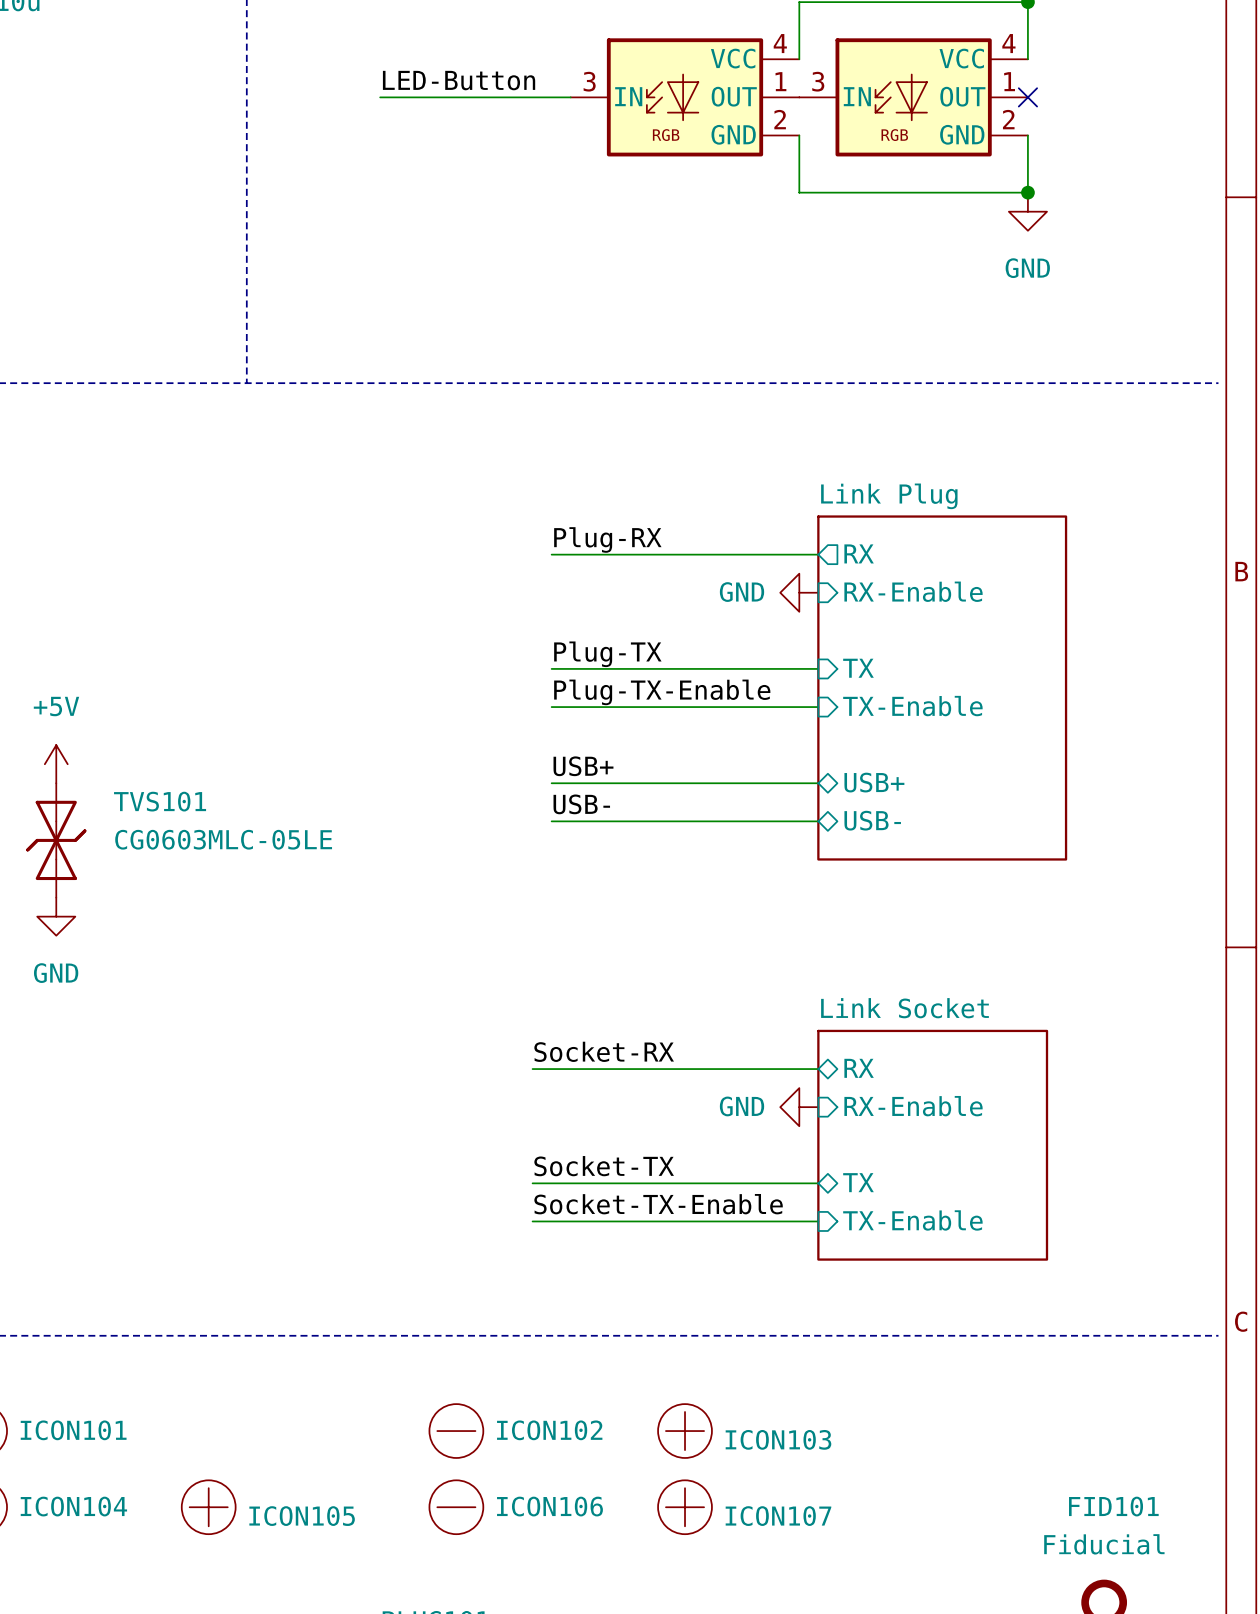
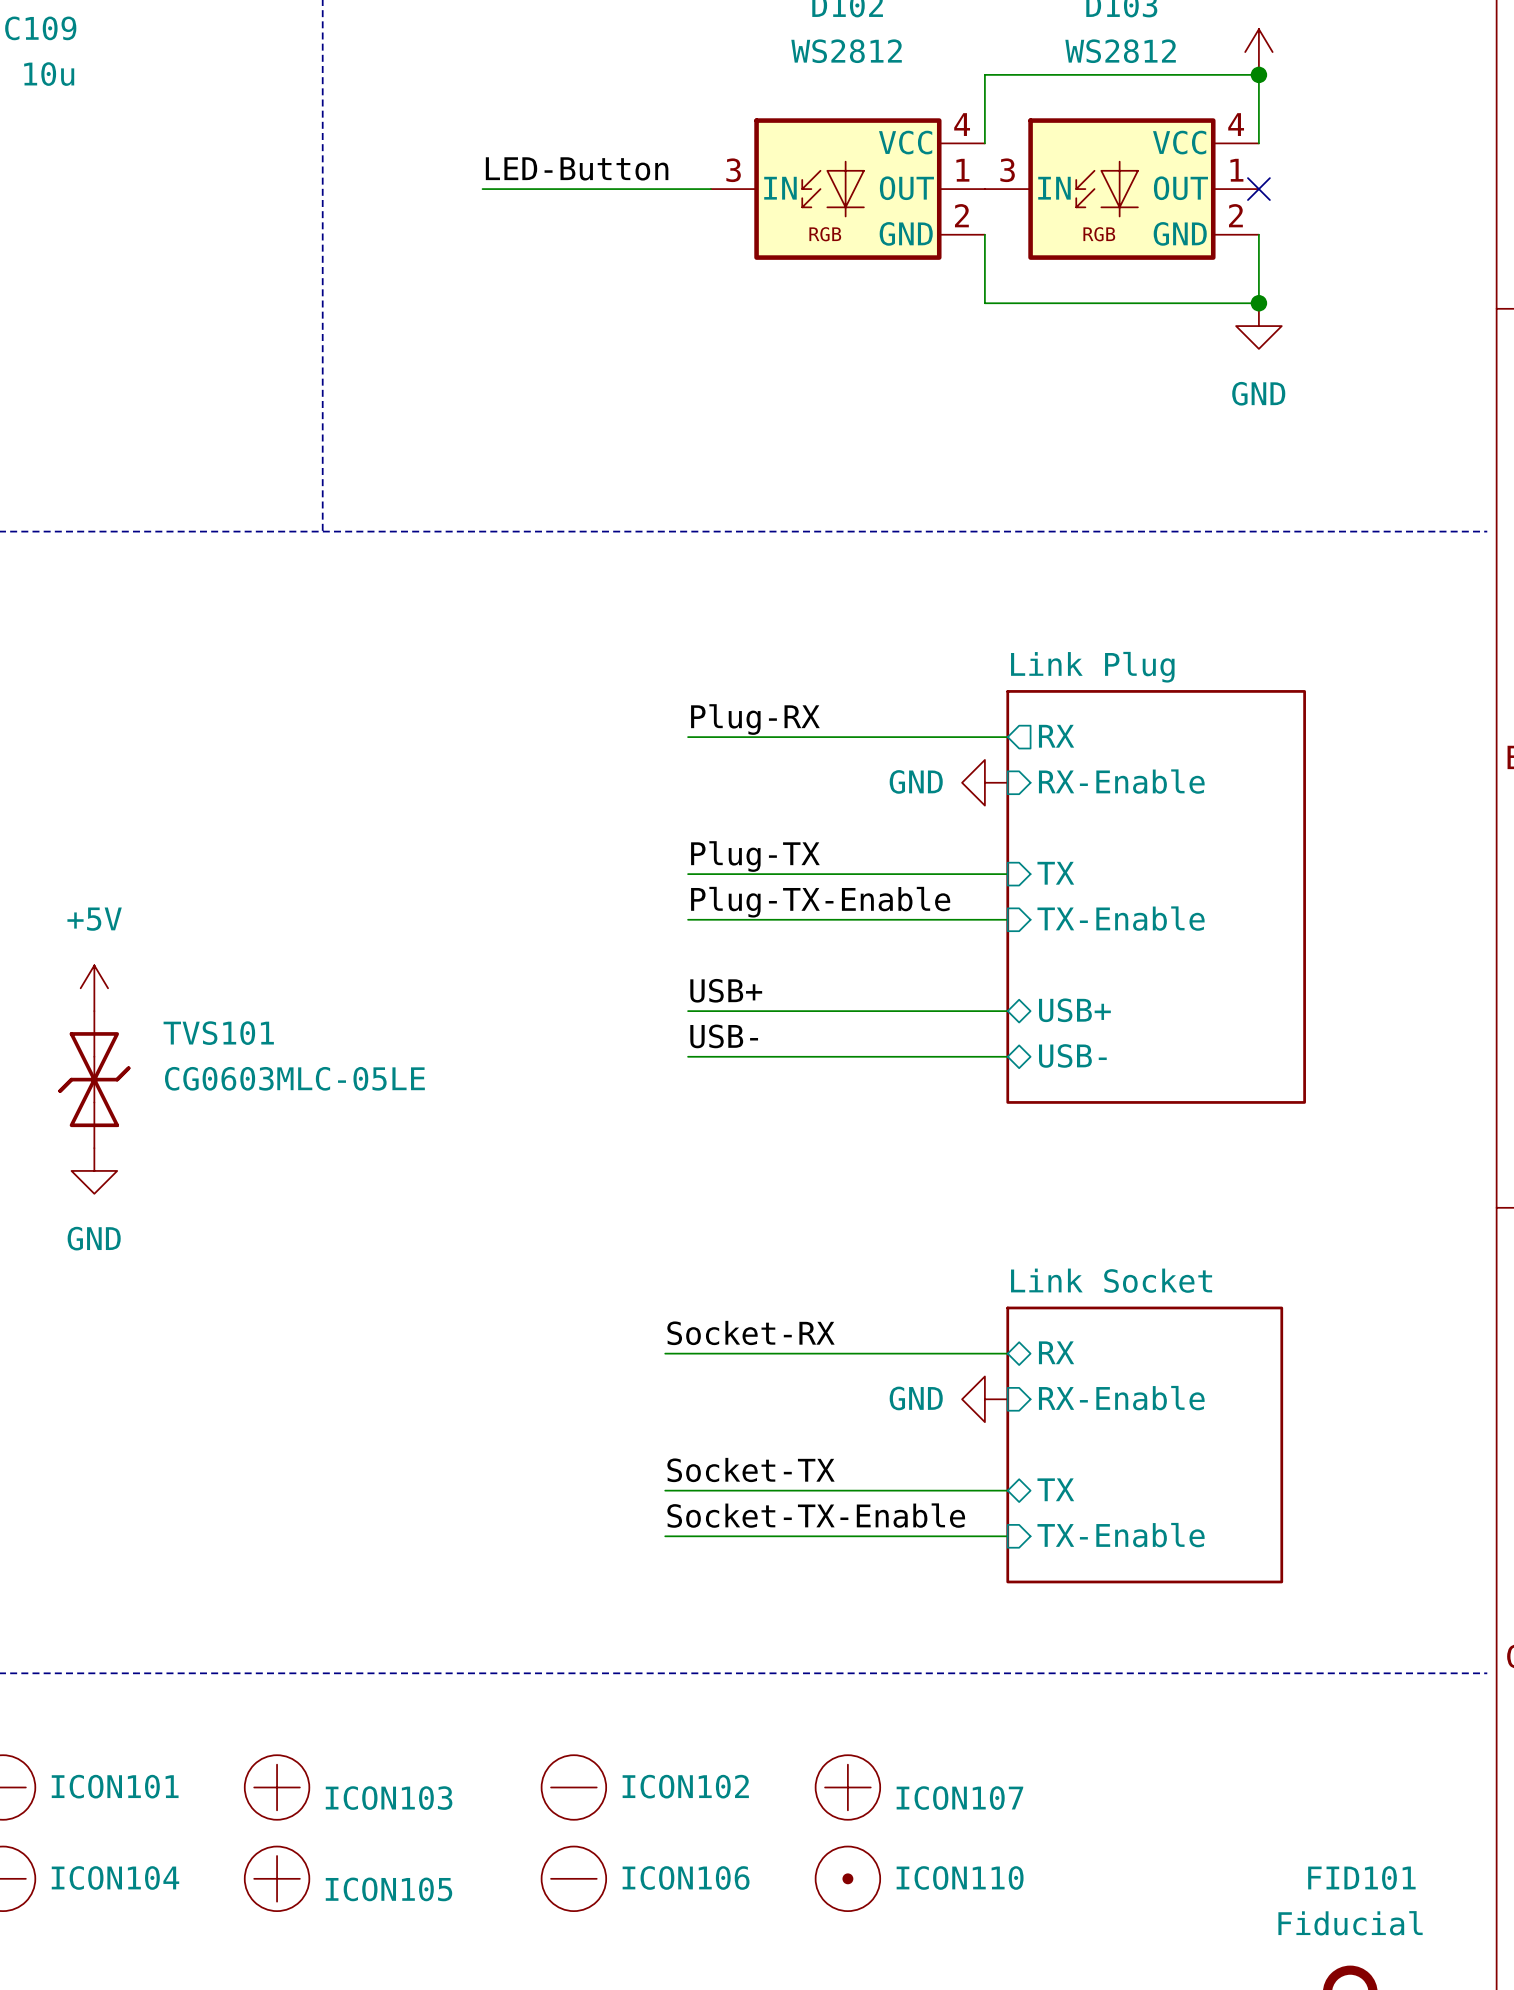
ICON103: none -> (277, 1787)
ICON103 name: ICON103 (778, 1439) -> ICON107 (959, 1798)
ICON107: (685, 1507) -> none
ICON110: none -> (847, 1878)

